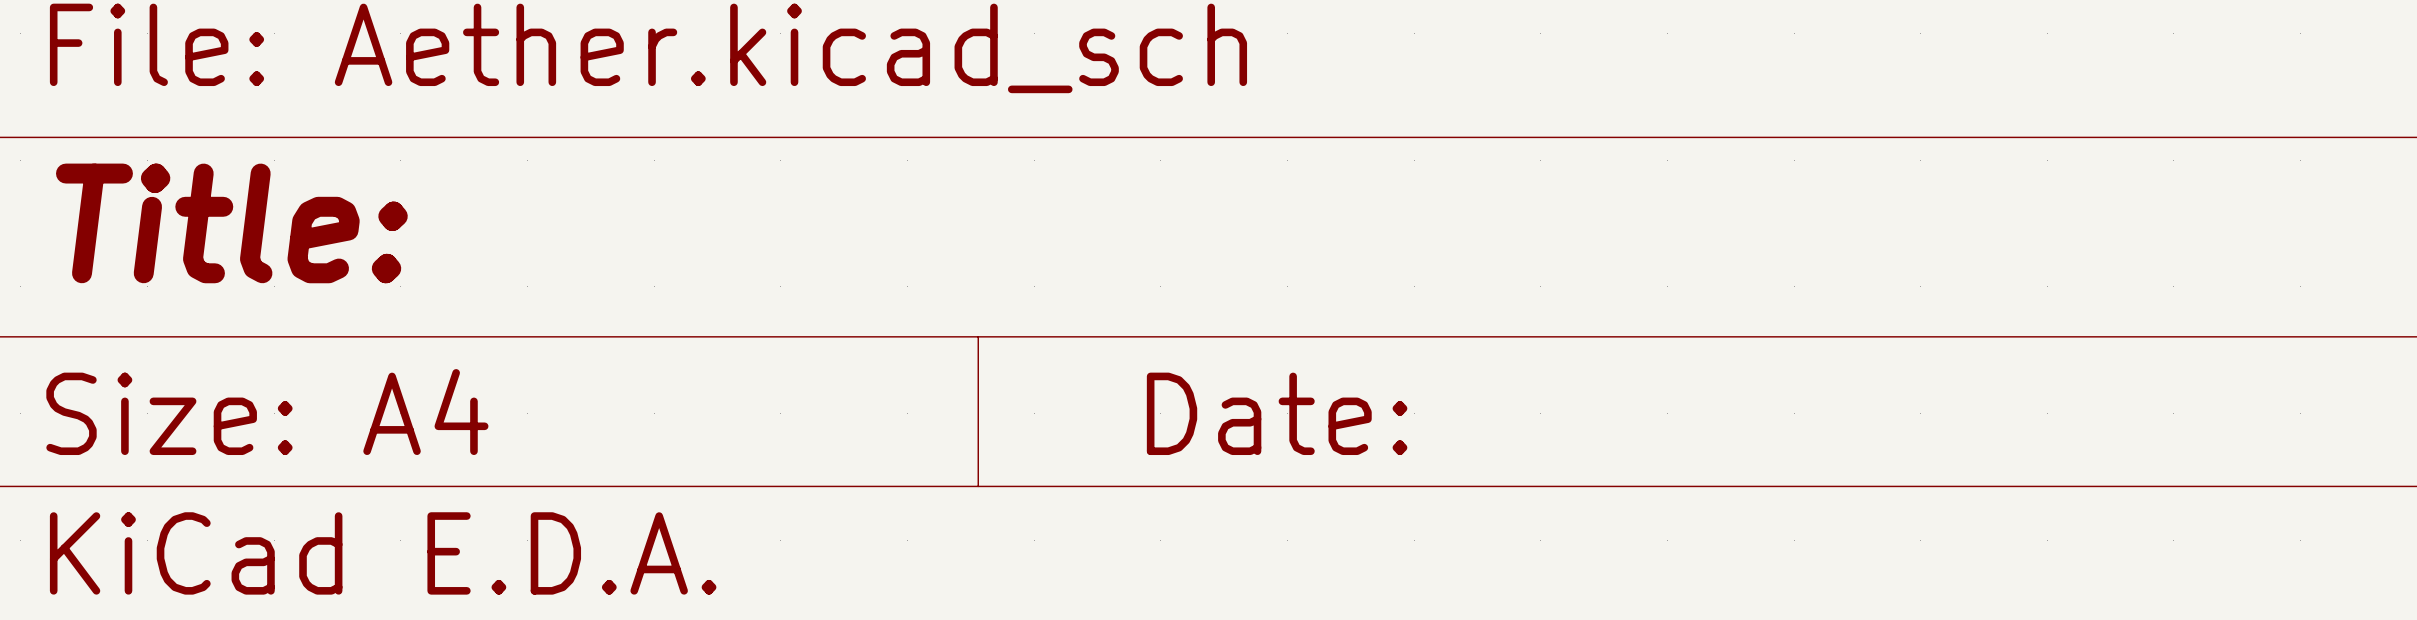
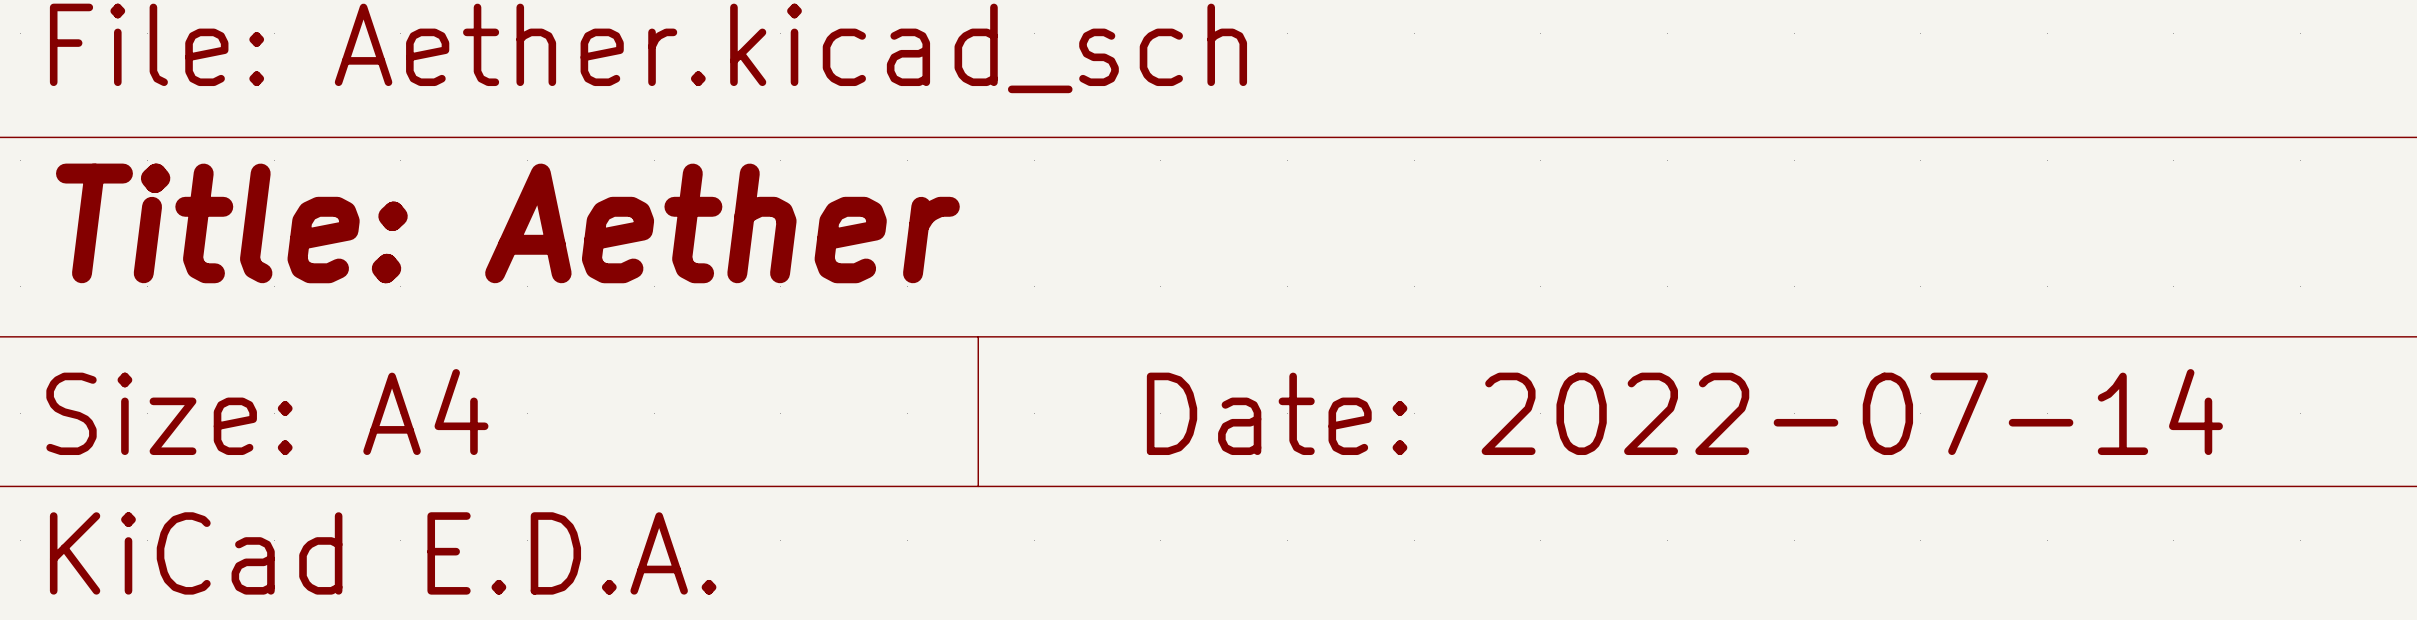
title block: Title: (231, 223) -> Title: Aether (507, 223)
title block: Date: (1277, 413) -> Date: 2022-07-14 (1684, 412)

